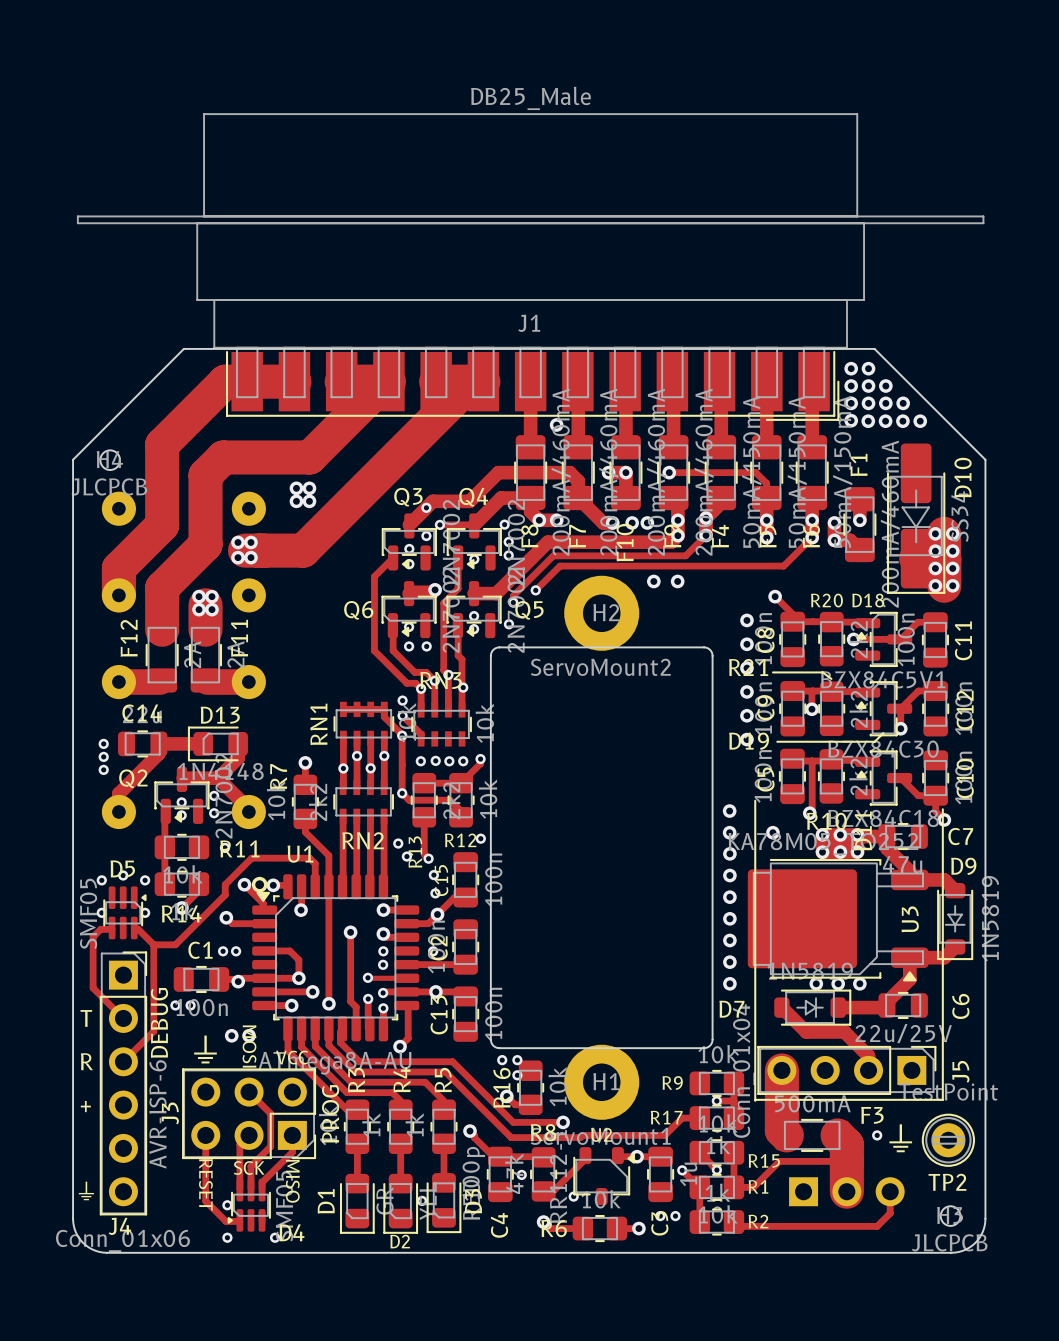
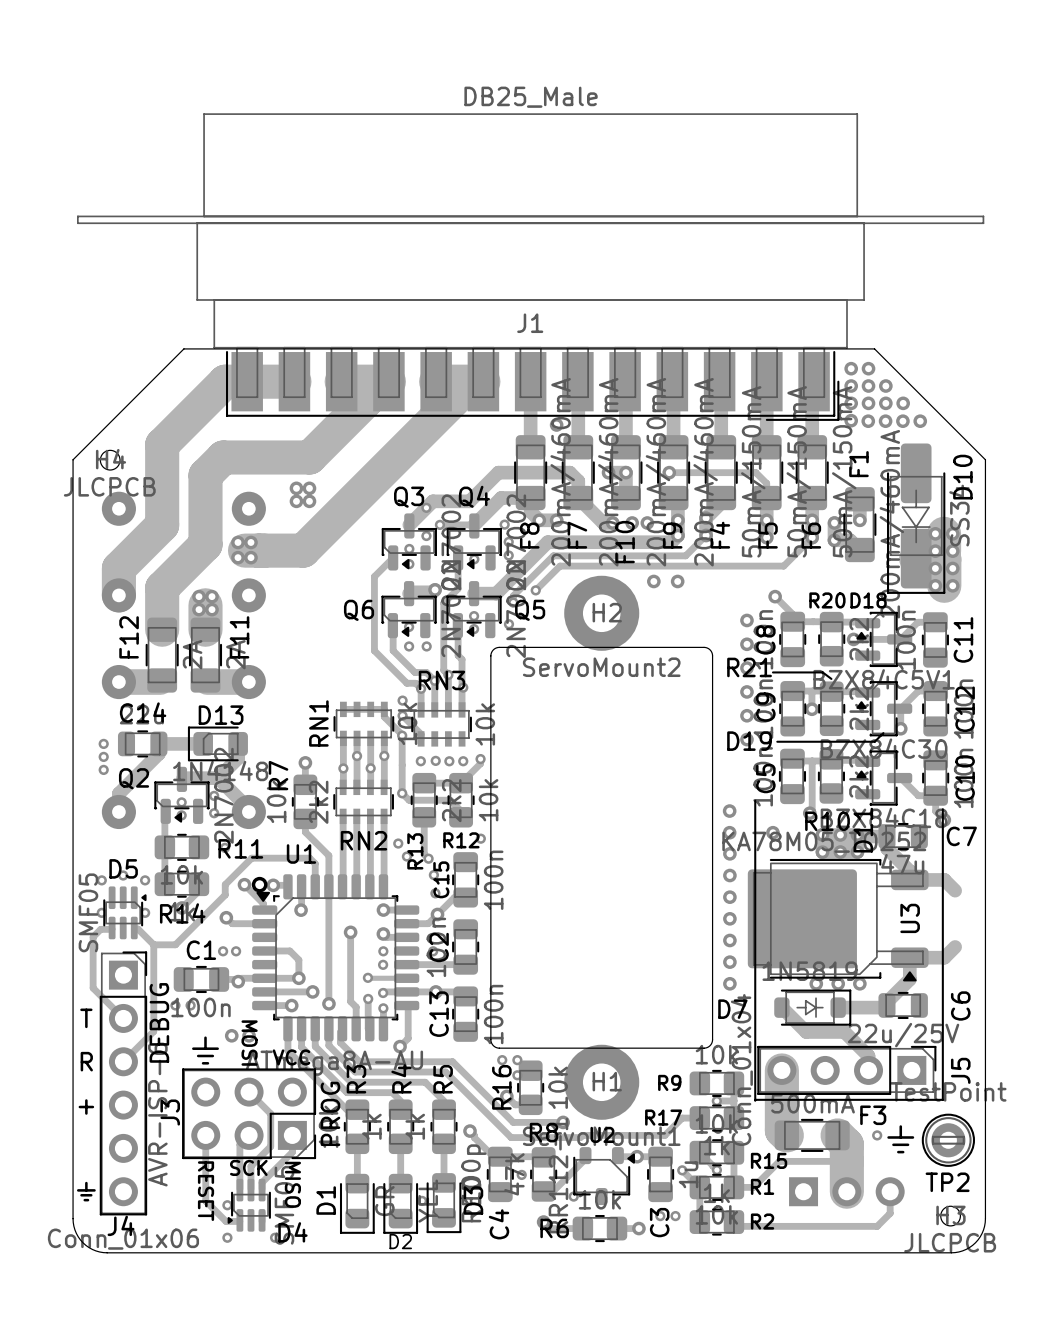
D9: 1N5819 (955, 921) -> none

